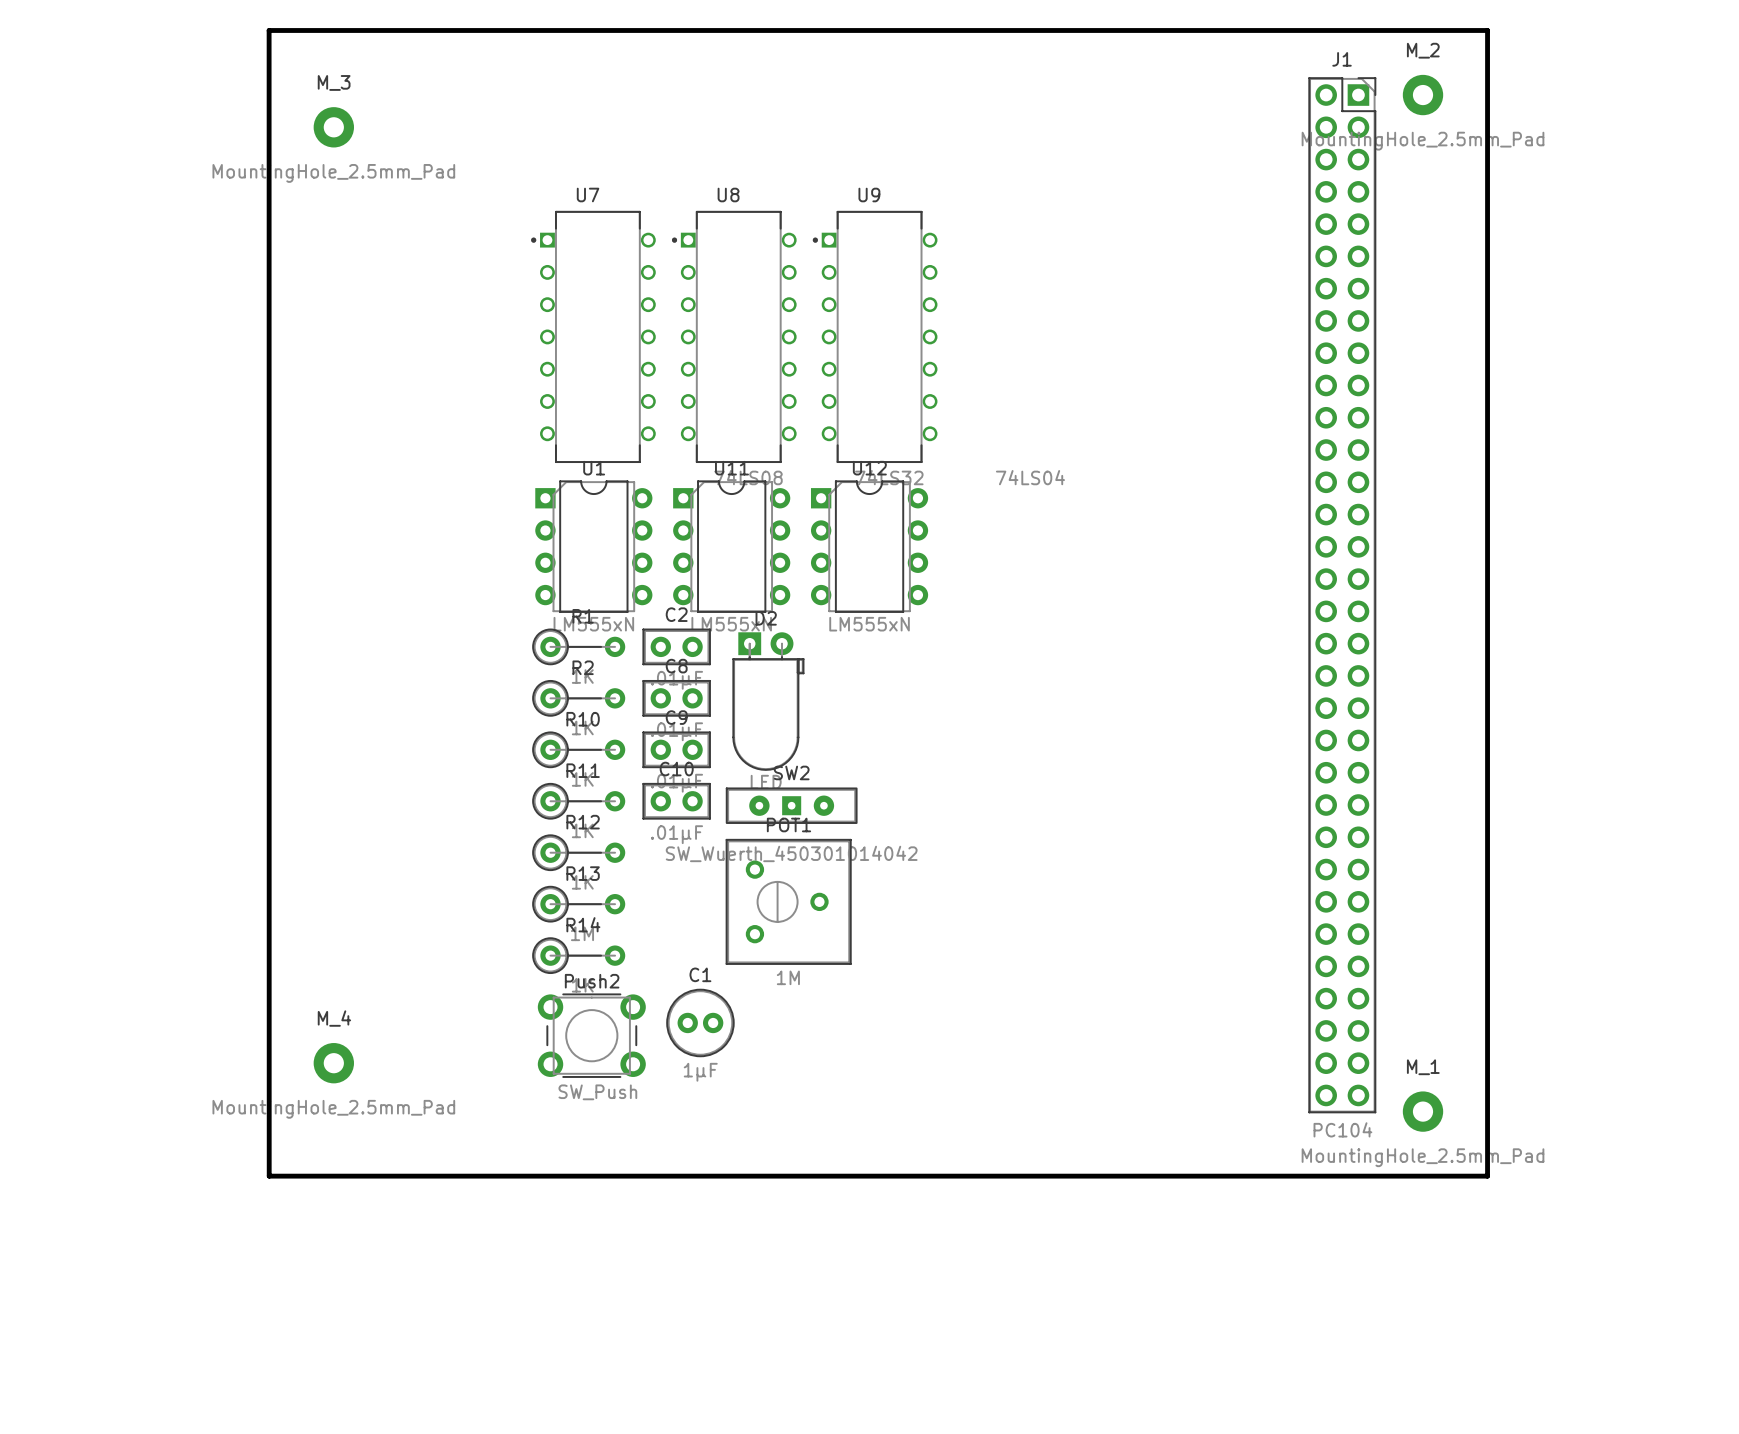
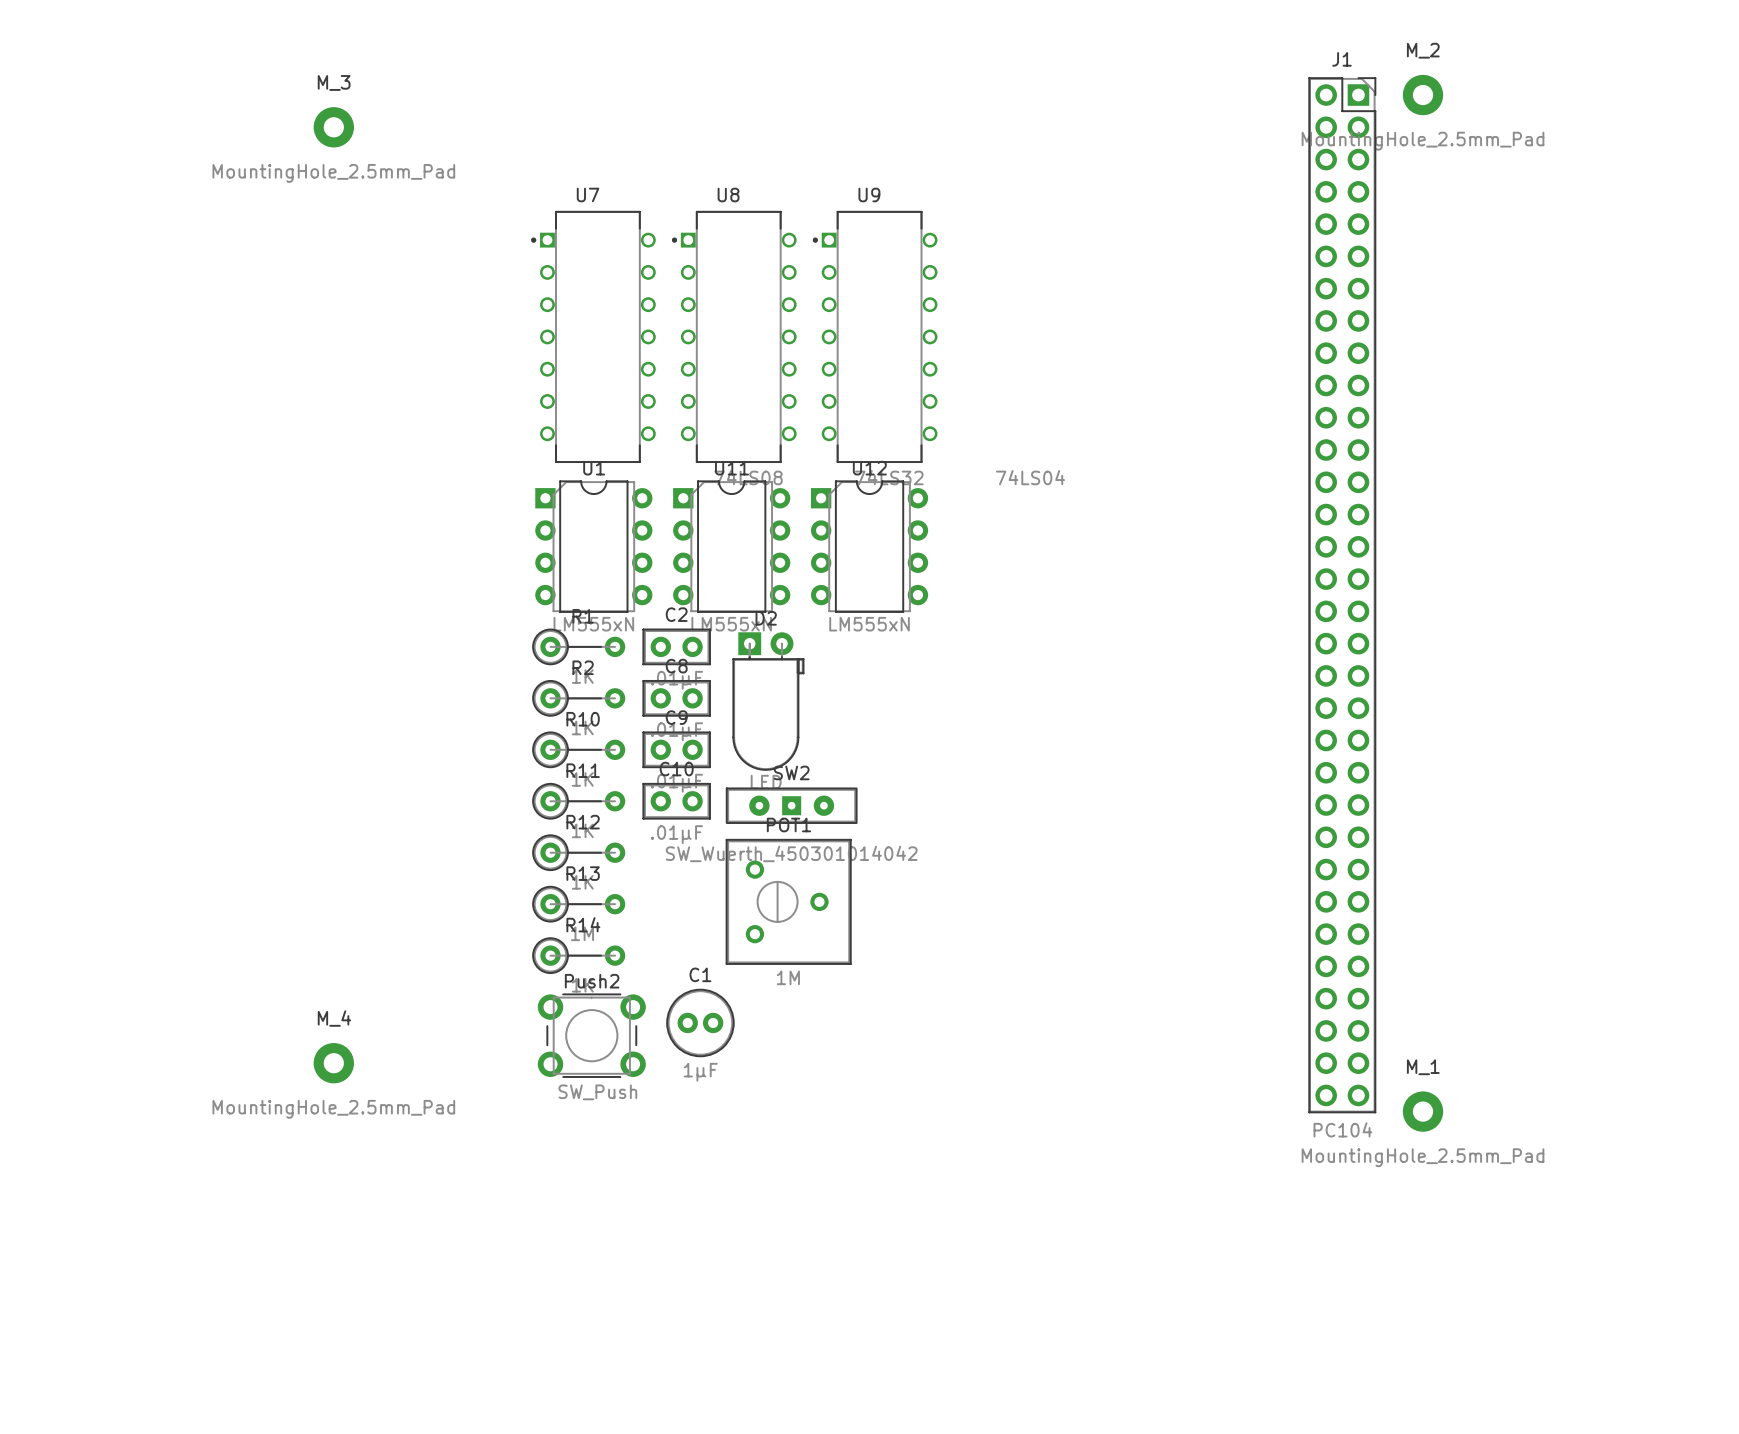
board edge: (269, 30) (1487, 30) (1487, 1176) (269, 1176) (269, 30) -> none

